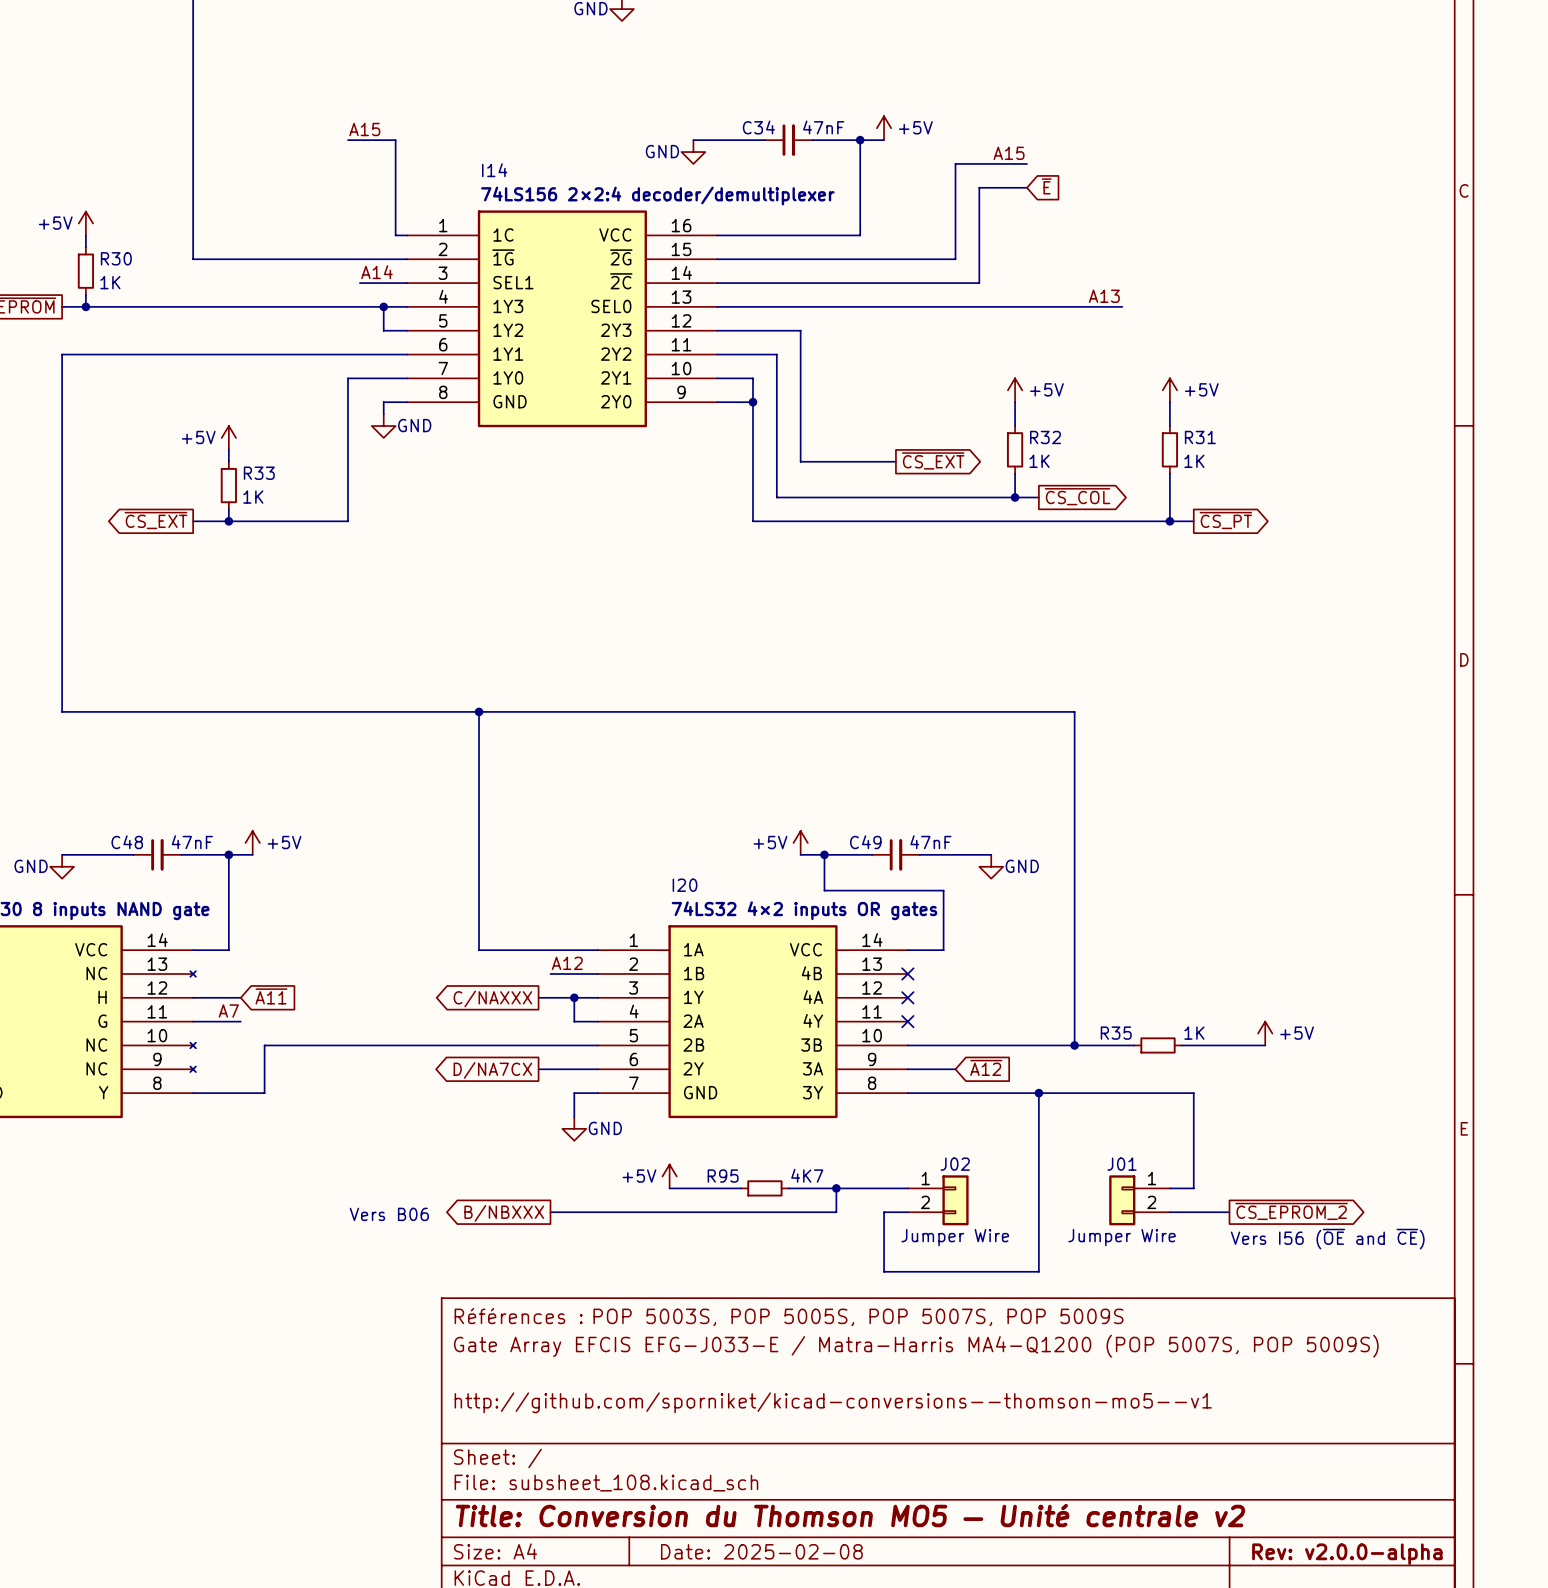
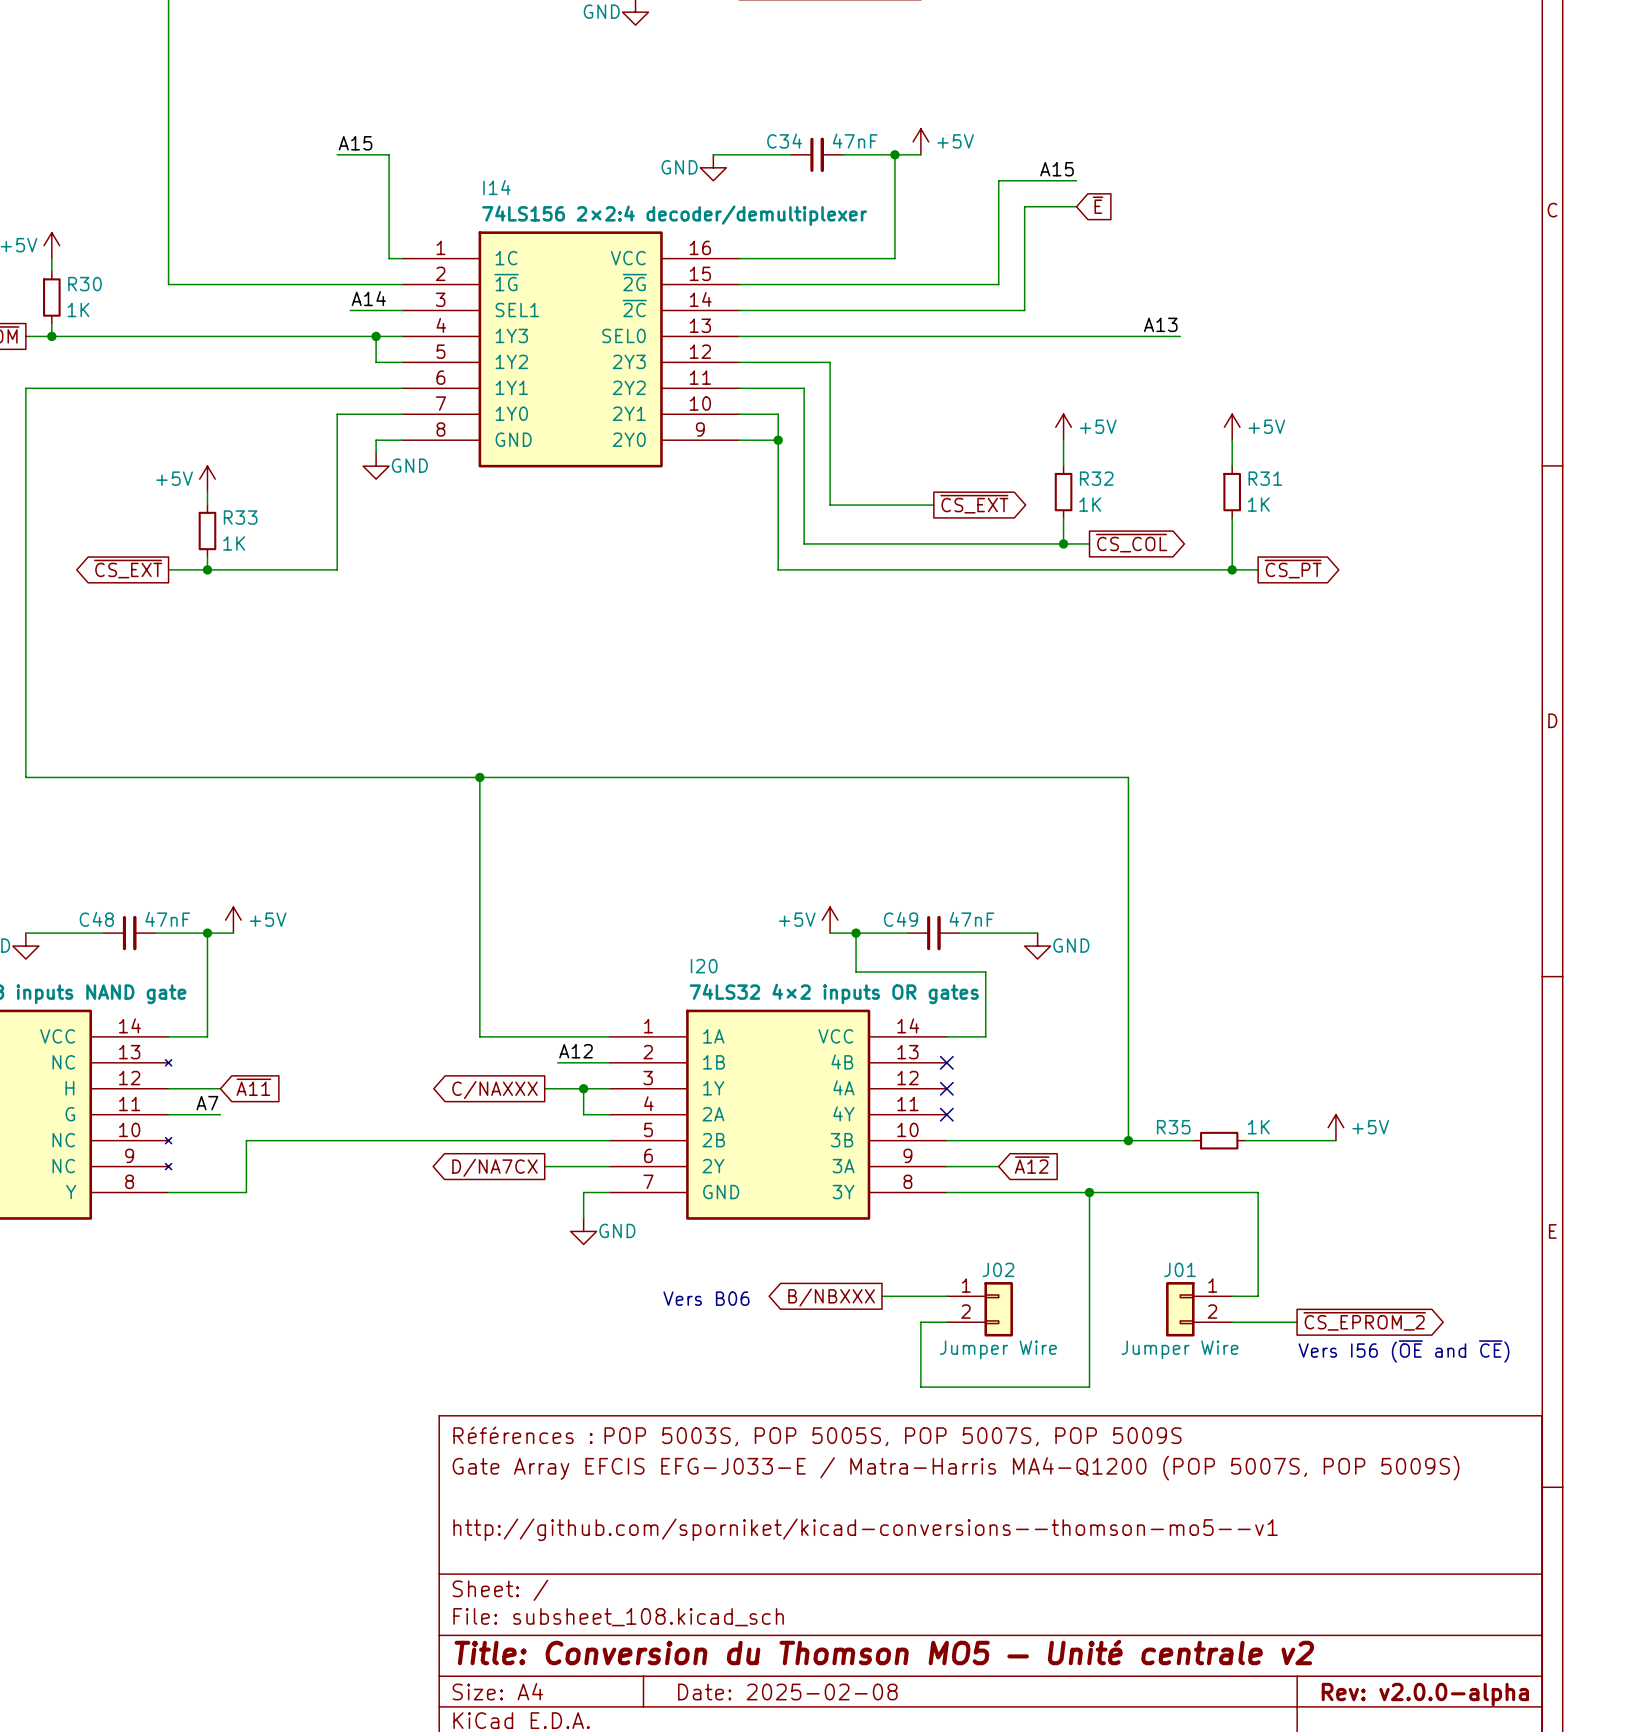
power symbol: +5V (669, 1176) -> none
wire: (669, 1188) (741, 1188) -> none
R95: 4K7 (764, 1188) -> none
wire: (788, 1188) (848, 1188) -> none
wire: (836, 1188) (836, 1212) (550, 1212) -> none
junction: (836, 1188) -> none
global label: none -> B/NBXXX (831, 1297)
text: none -> Vers B06 (706, 1298)
global label: B/NBXXX (504, 1213) -> none
text: Vers B06 (389, 1214) -> none

